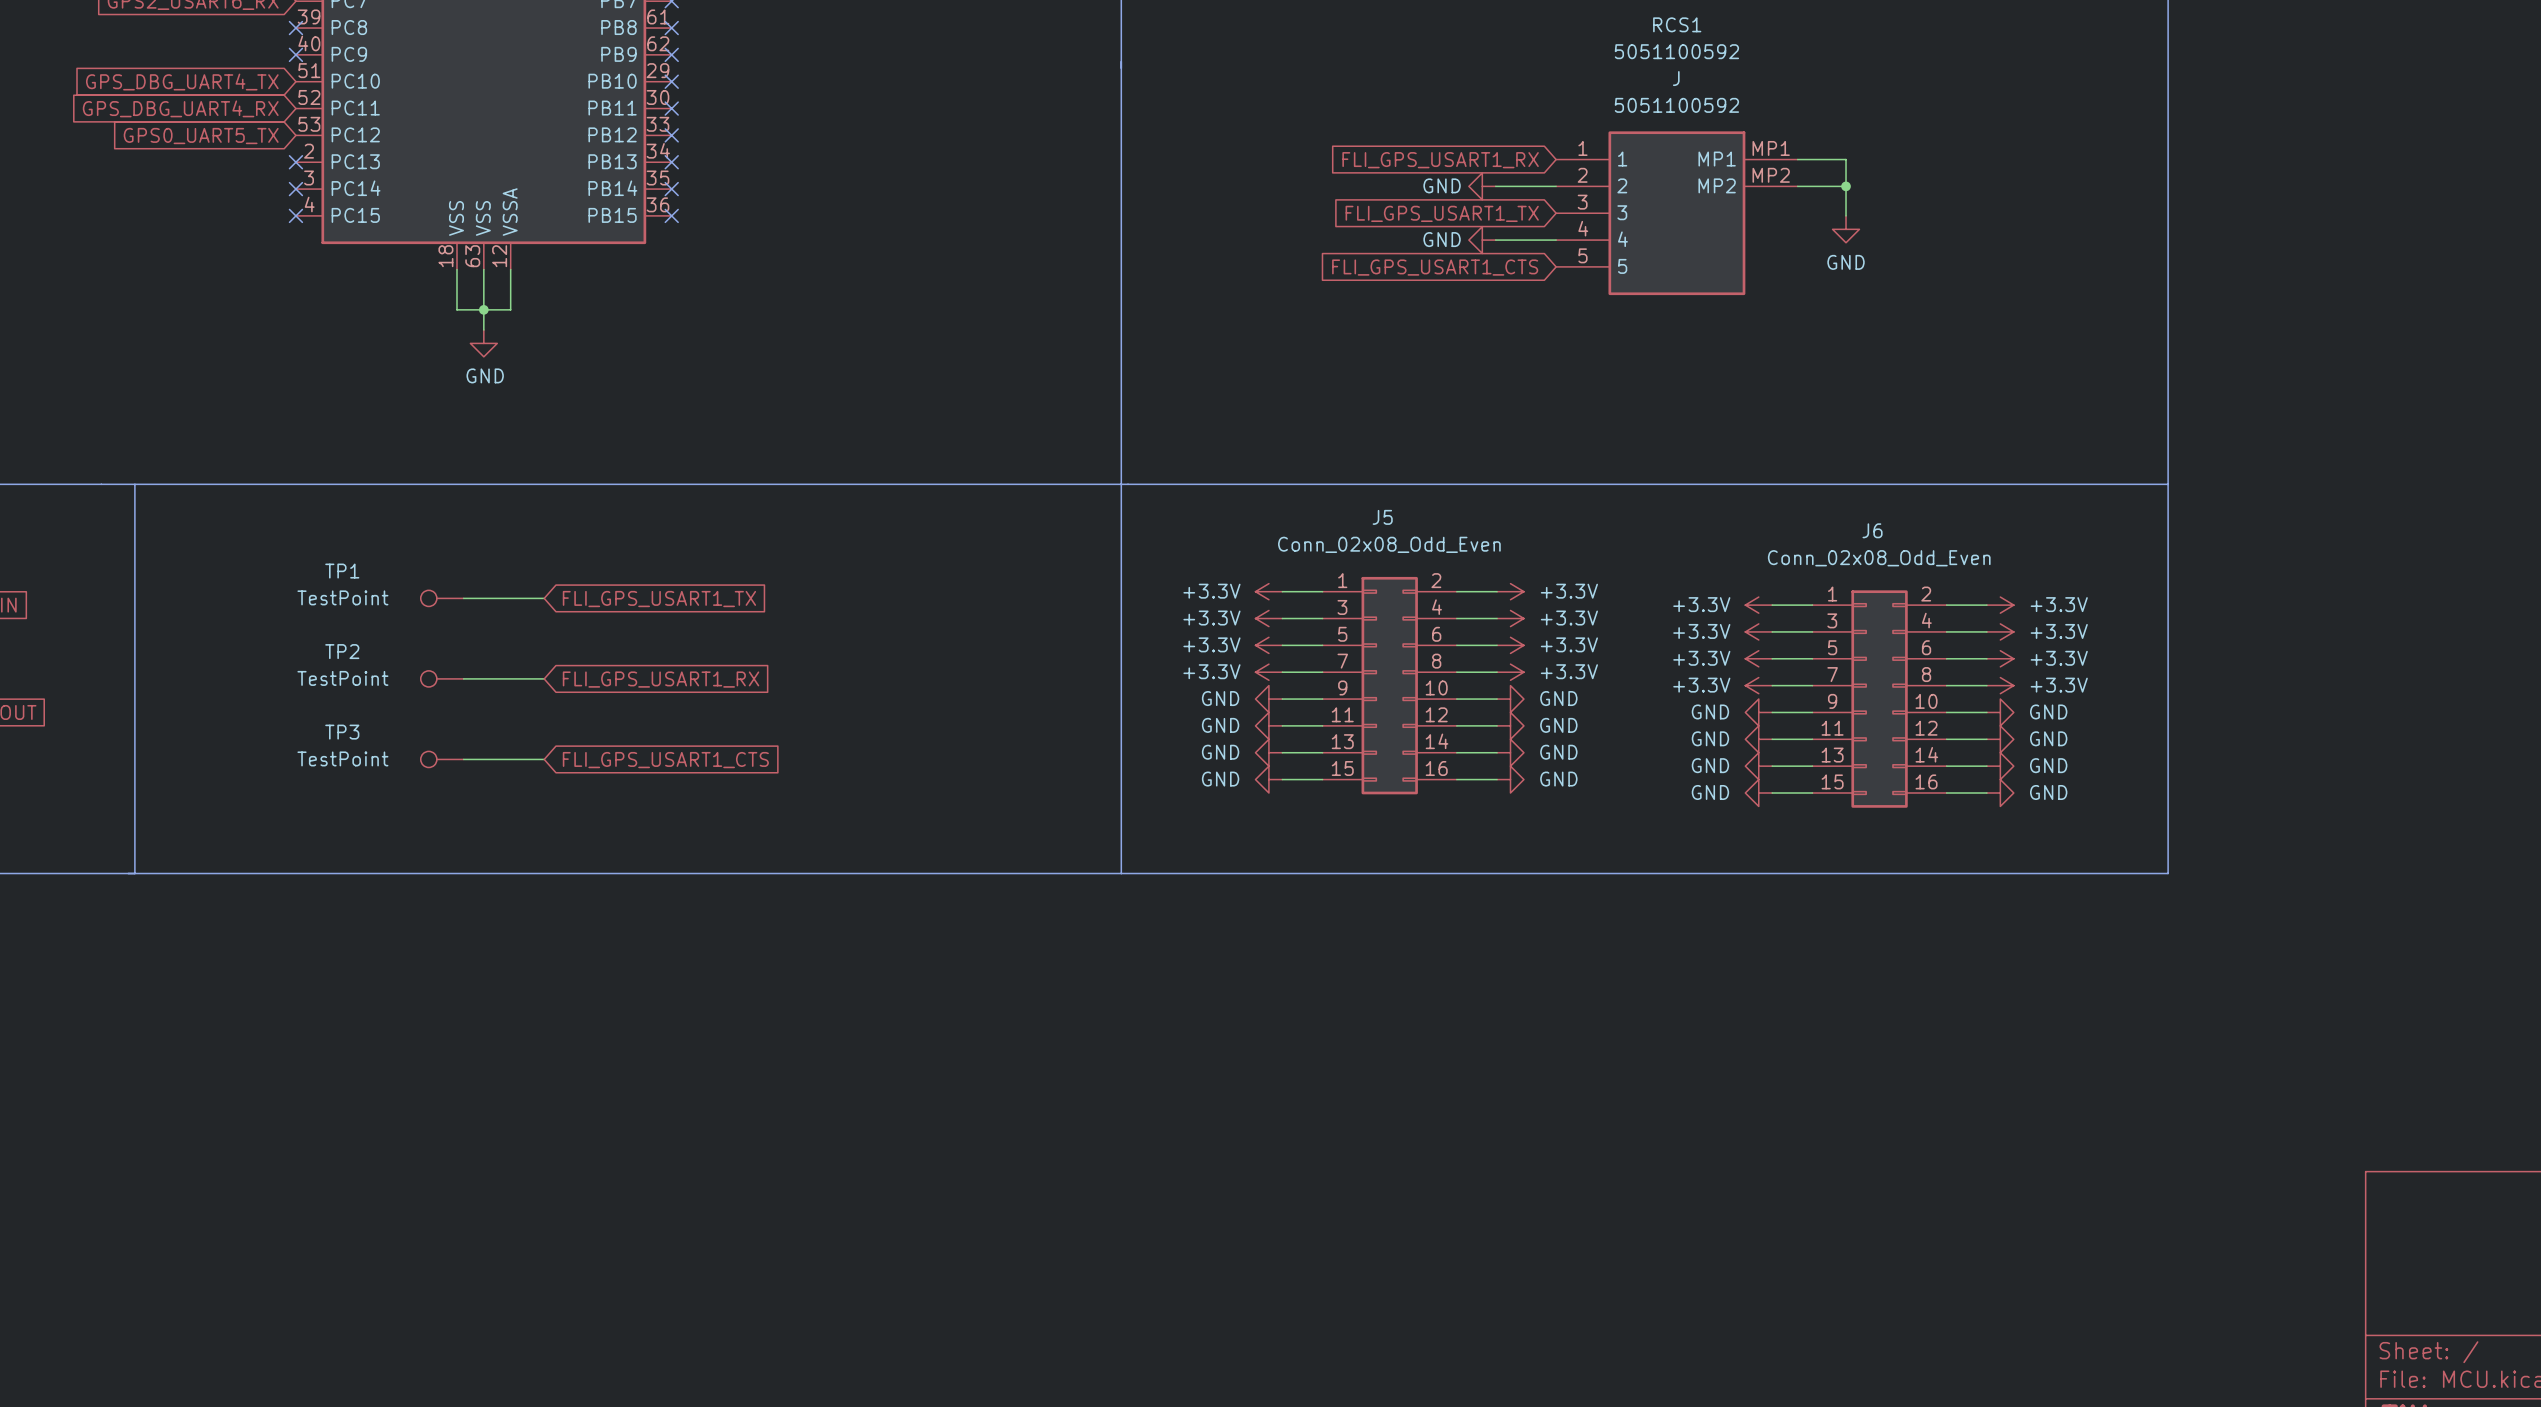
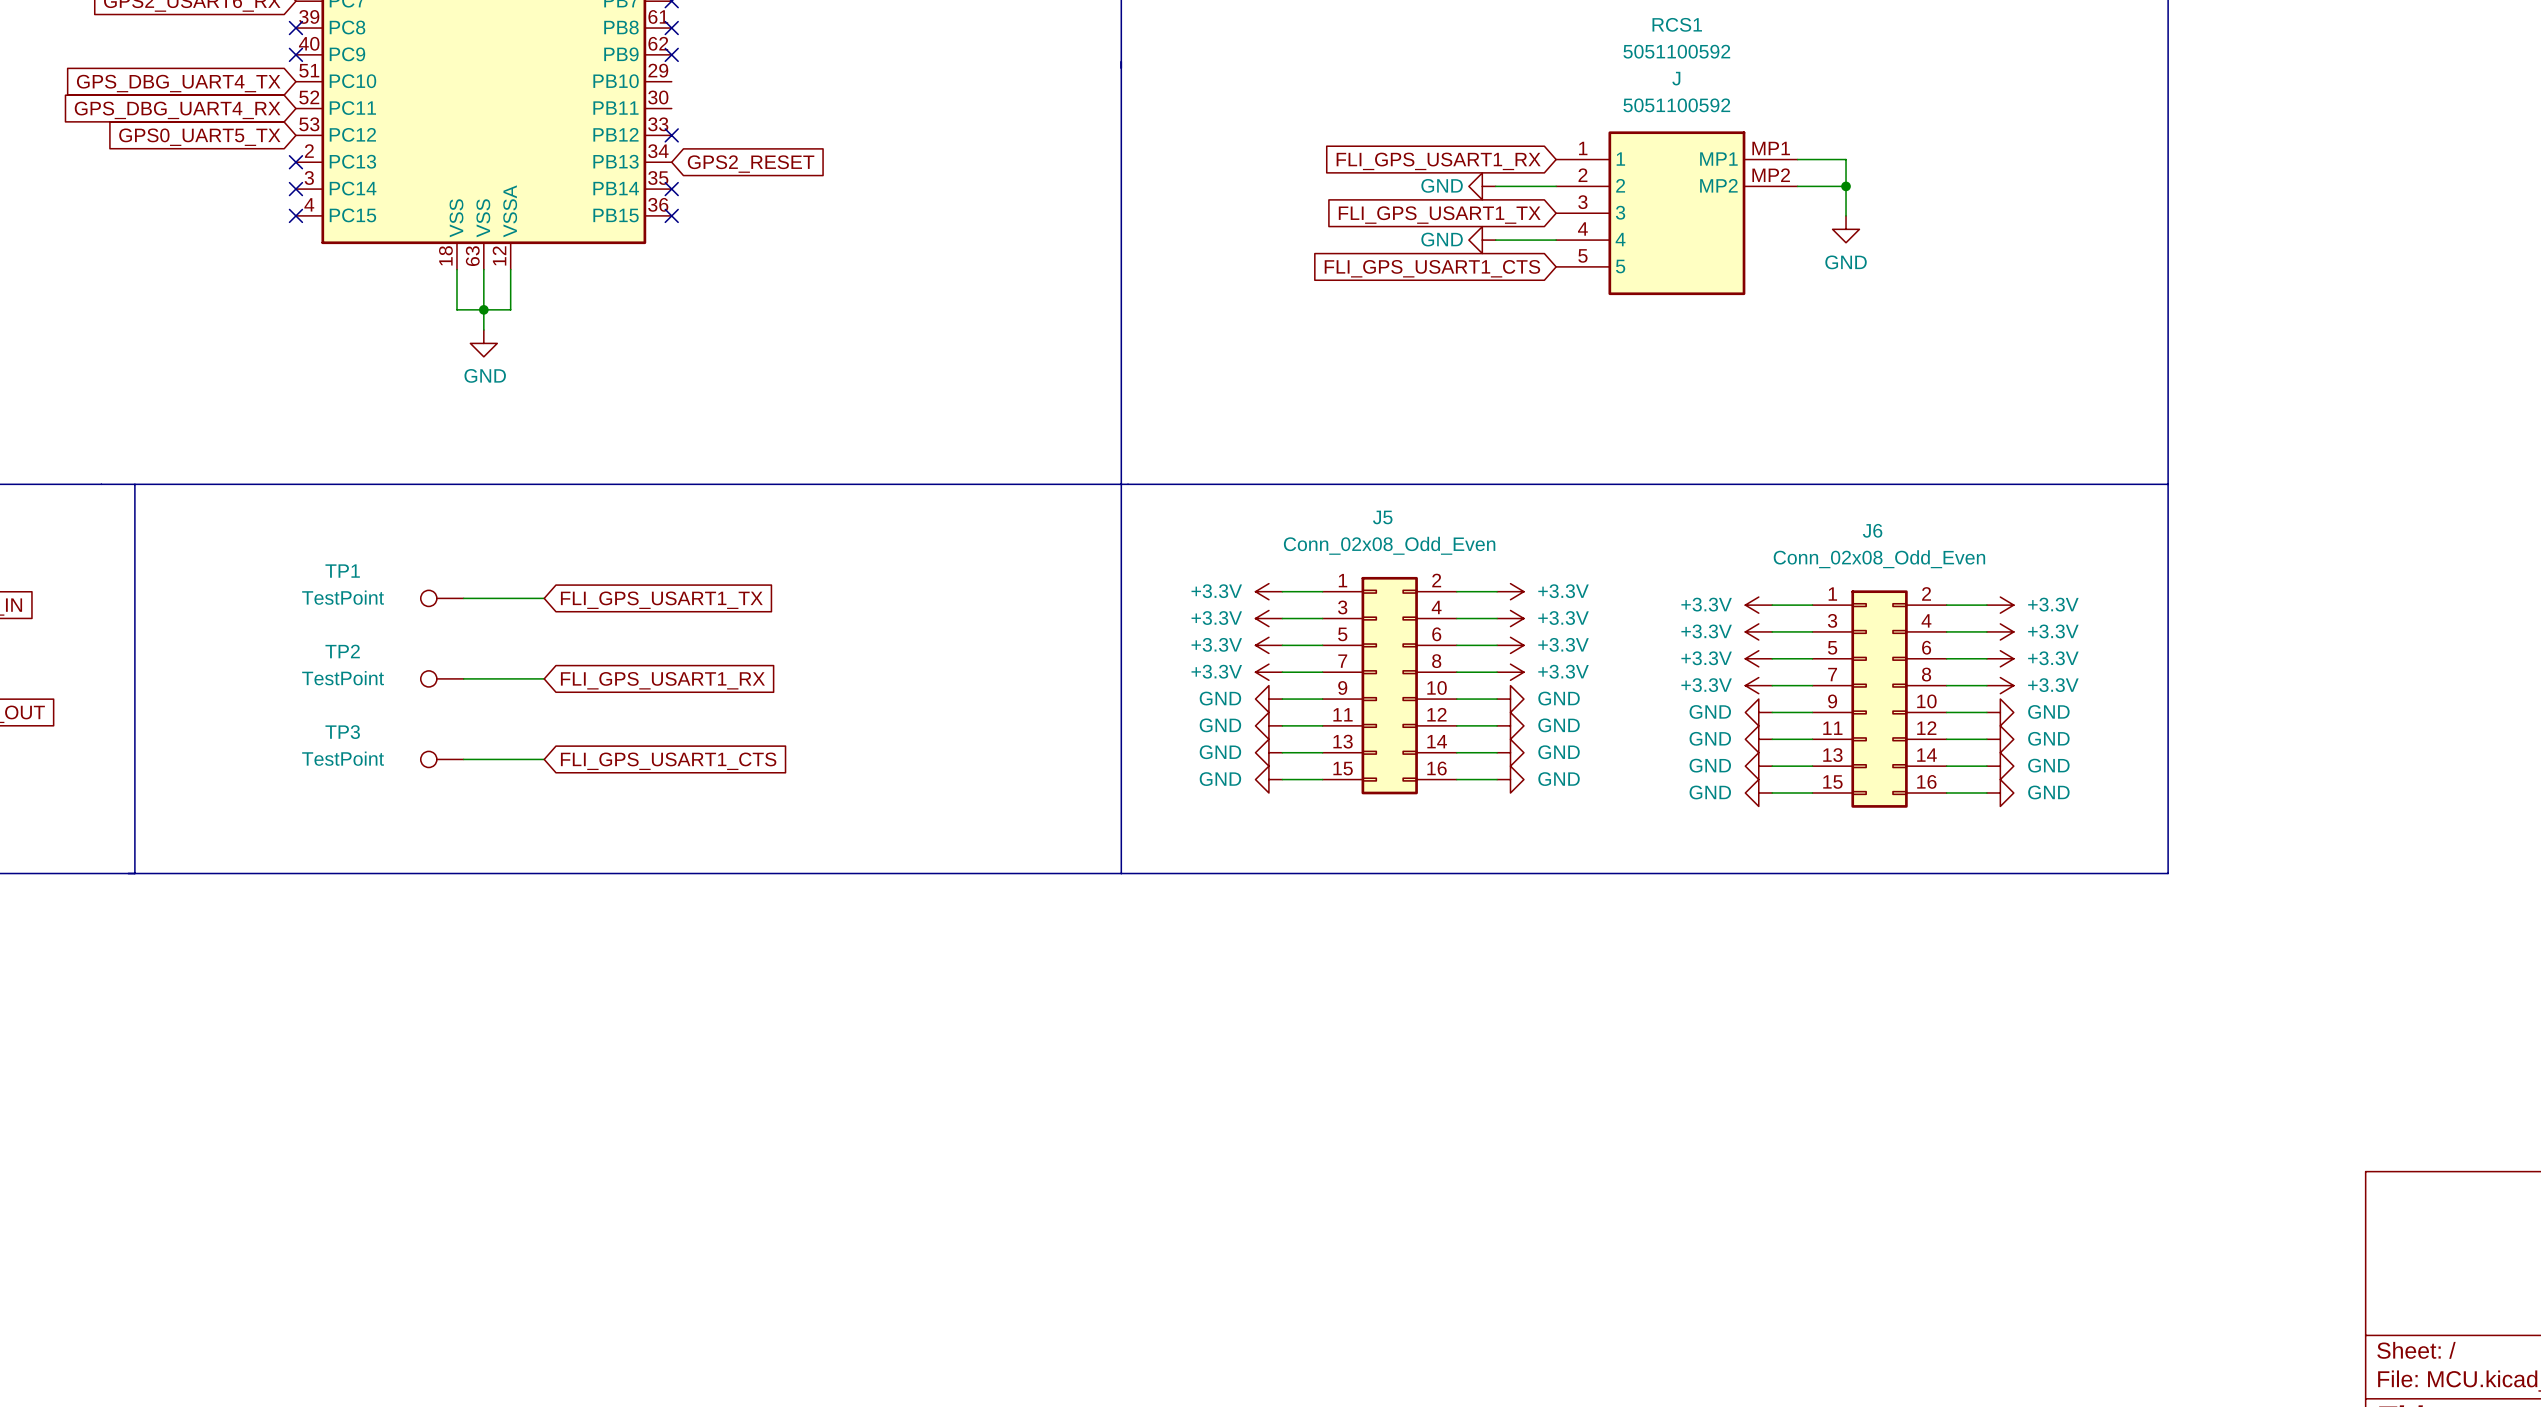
no-connect mark: (671, 81) -> none
no-connect mark: (671, 108) -> none
no-connect mark: (671, 162) -> none
global label: none -> GPS2_RESET (751, 164)

